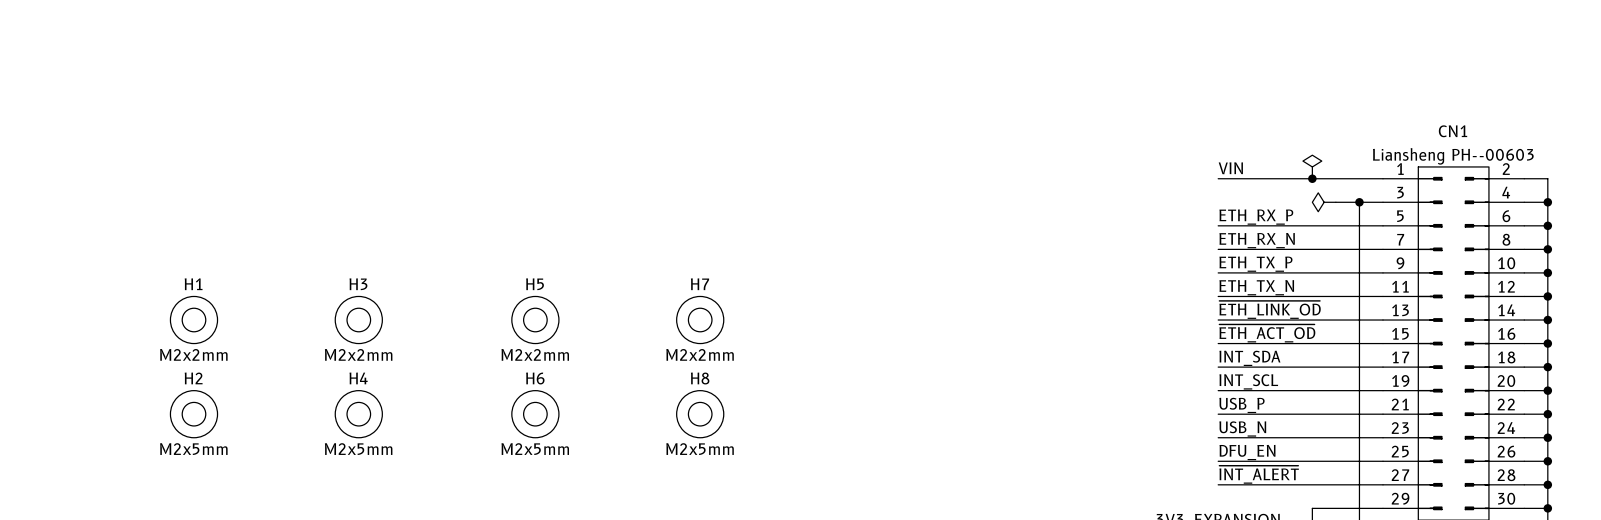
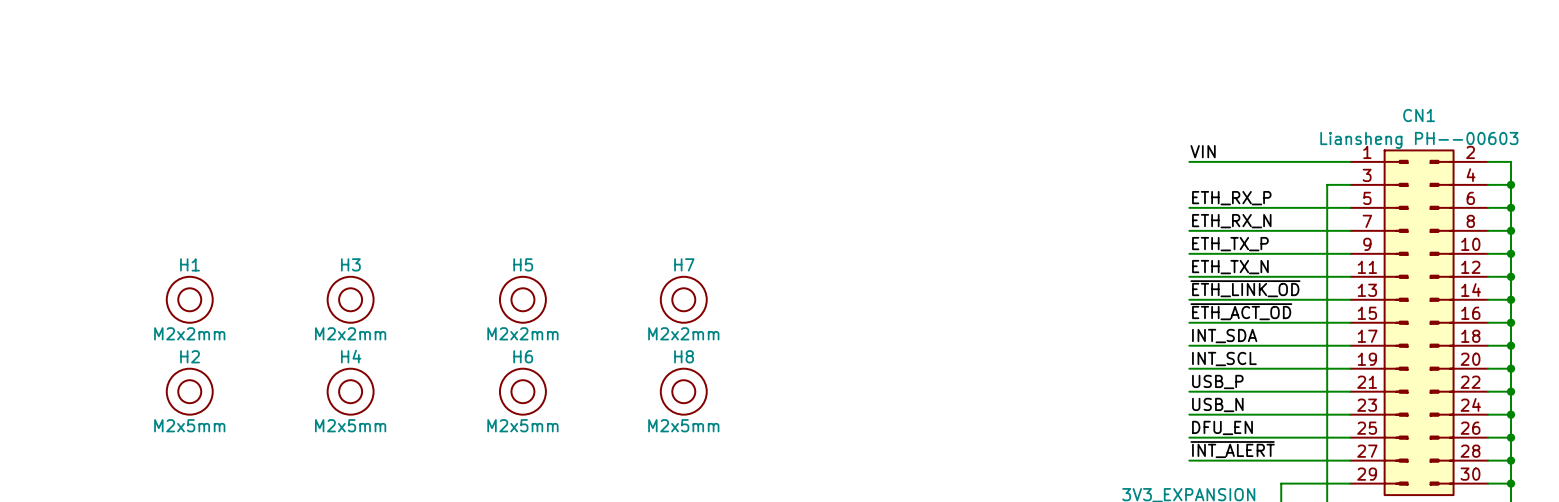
power symbol: (1312, 166) -> none
junction: (1312, 178) -> none
power symbol: (1324, 202) -> none
wire: (1335, 202) (1359, 202) -> none
junction: (1359, 202) -> none

